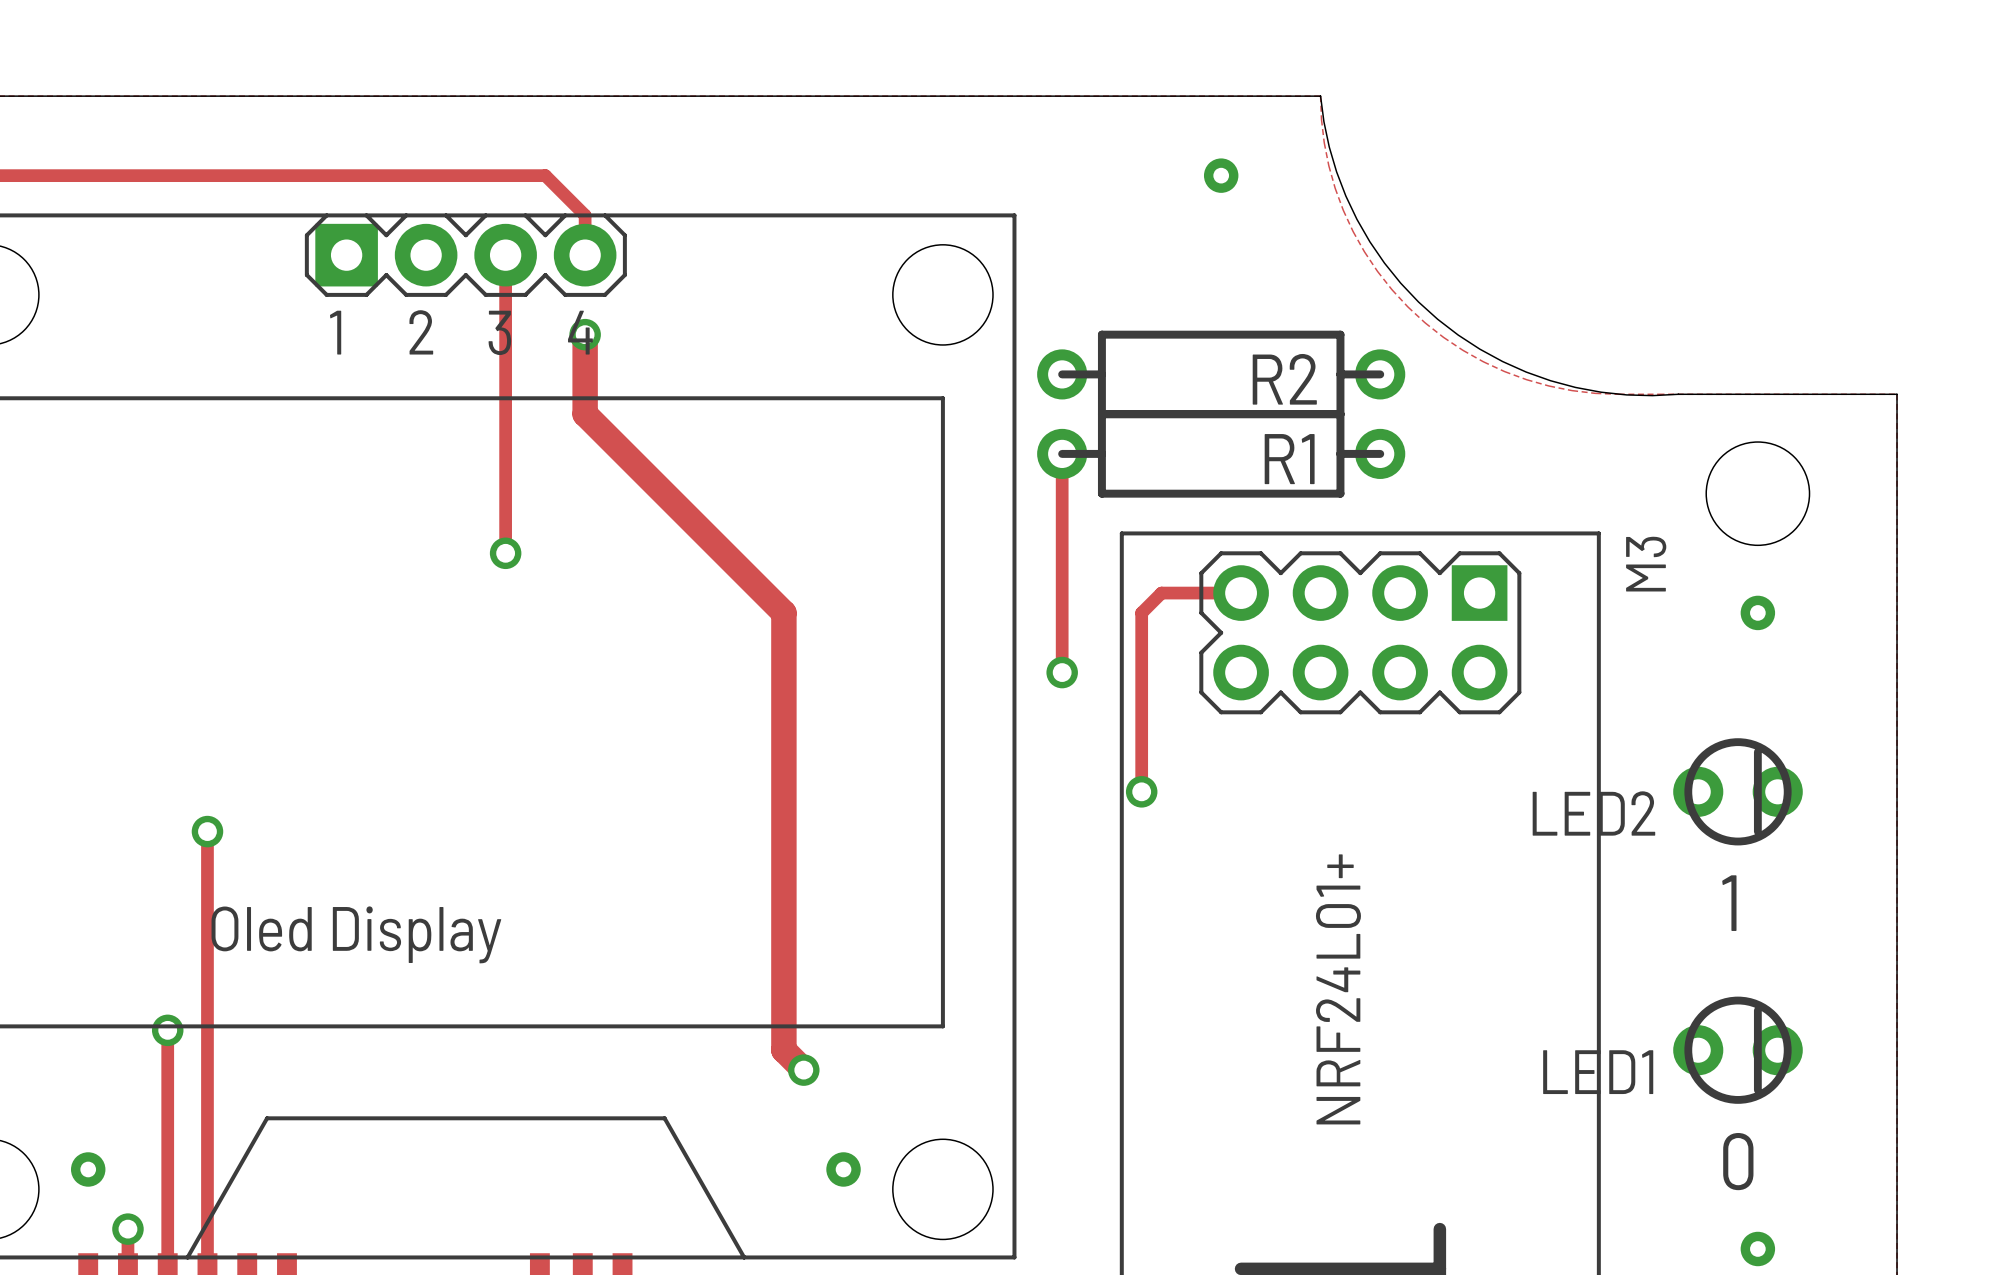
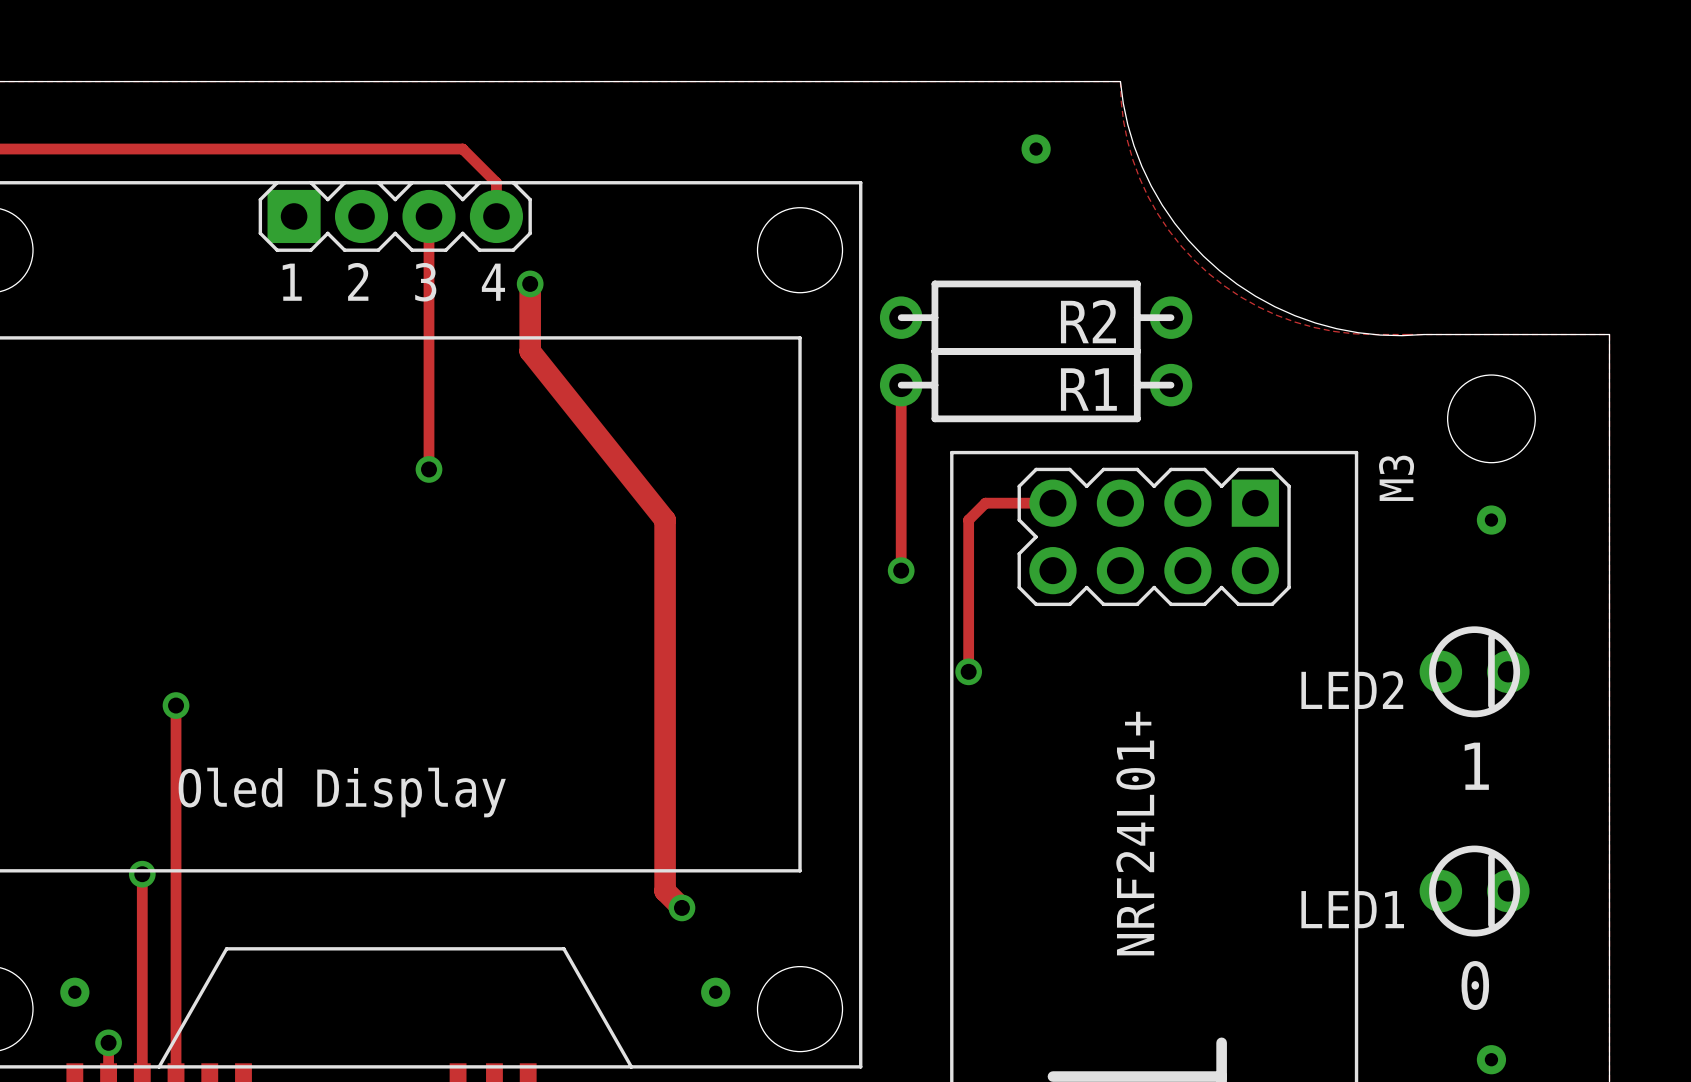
track: (585, 334) (585, 414) (783, 612) -> (530, 283) (530, 351) (665, 520)
via position: (585, 334) -> (530, 283)

